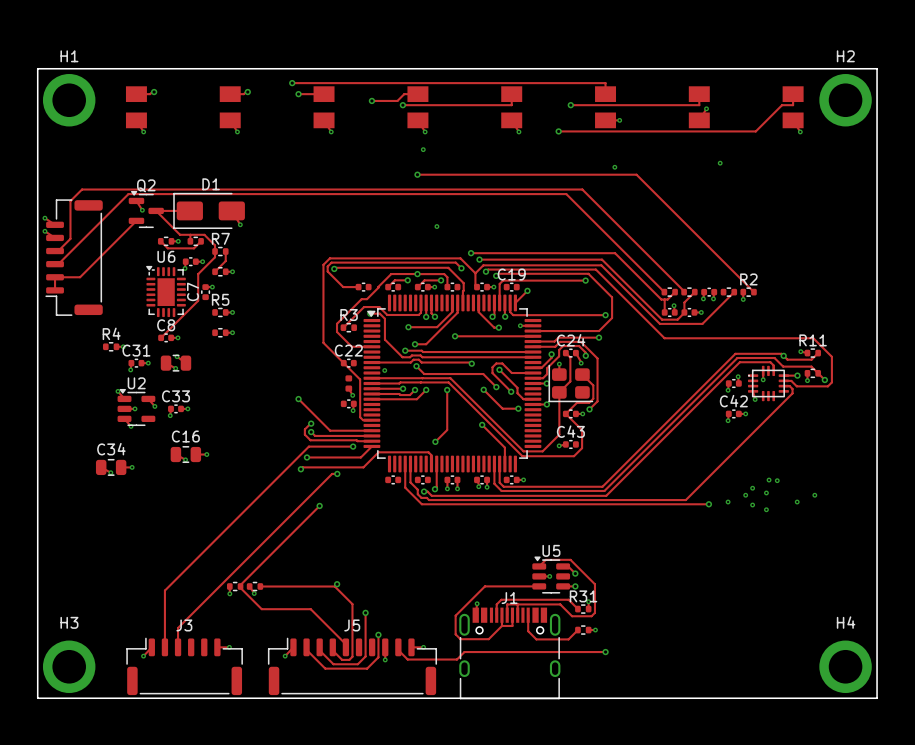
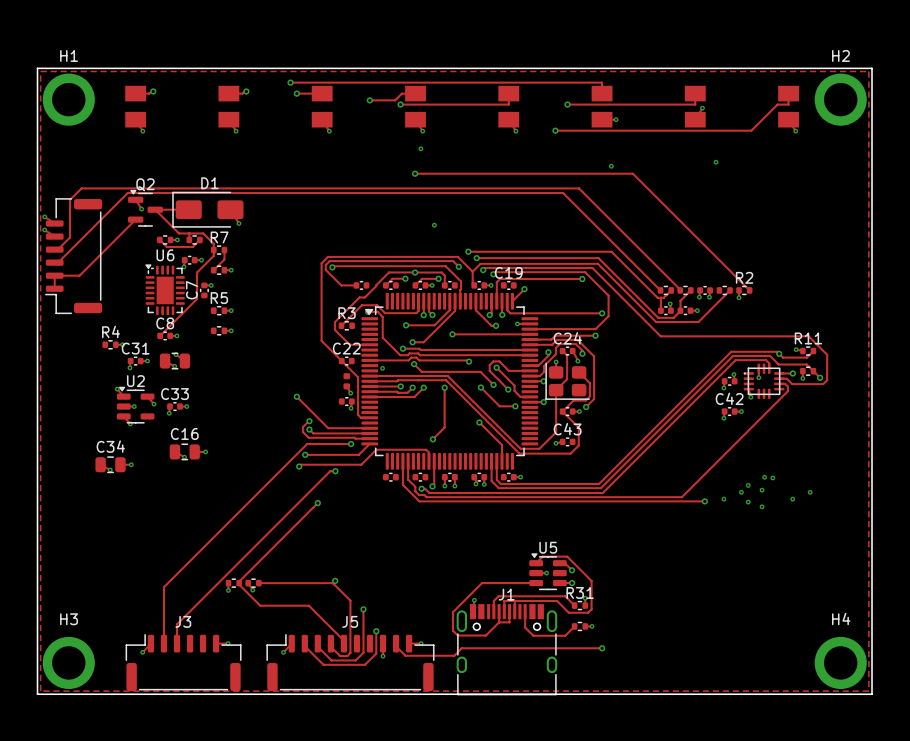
zone outline: none -> (40, 71) (868, 71) (868, 691) (40, 691) (40, 71)

